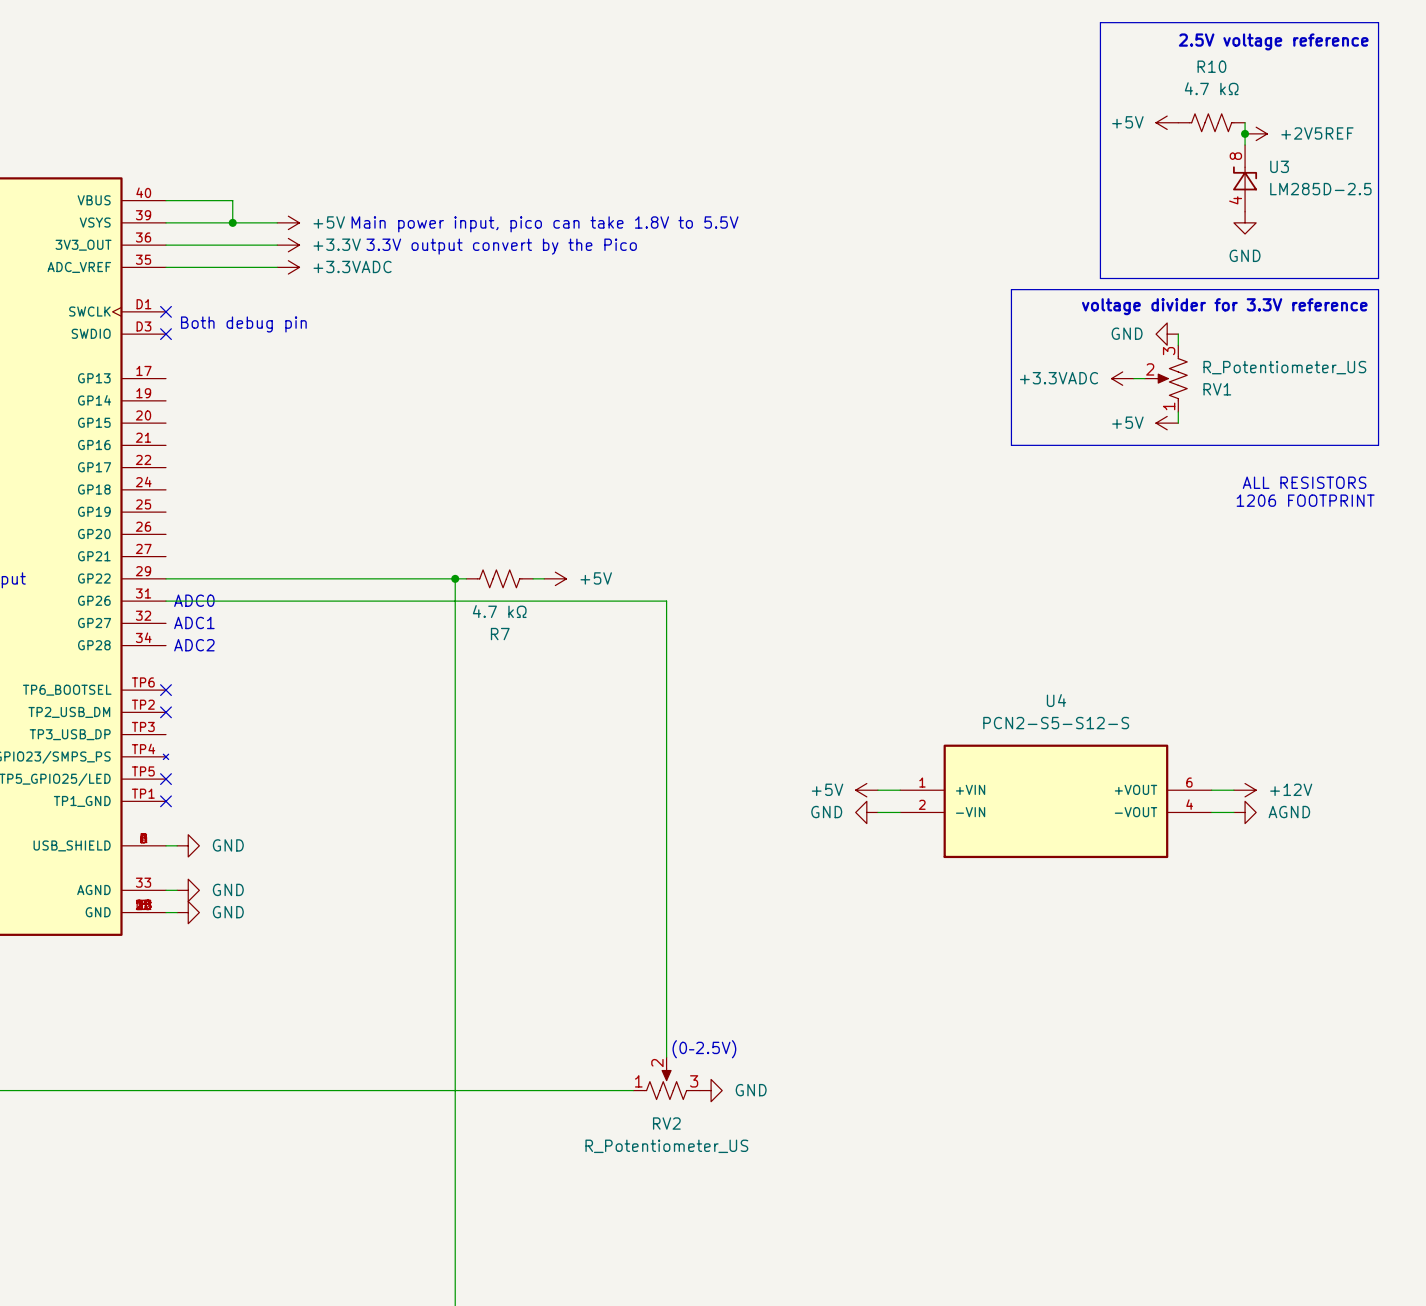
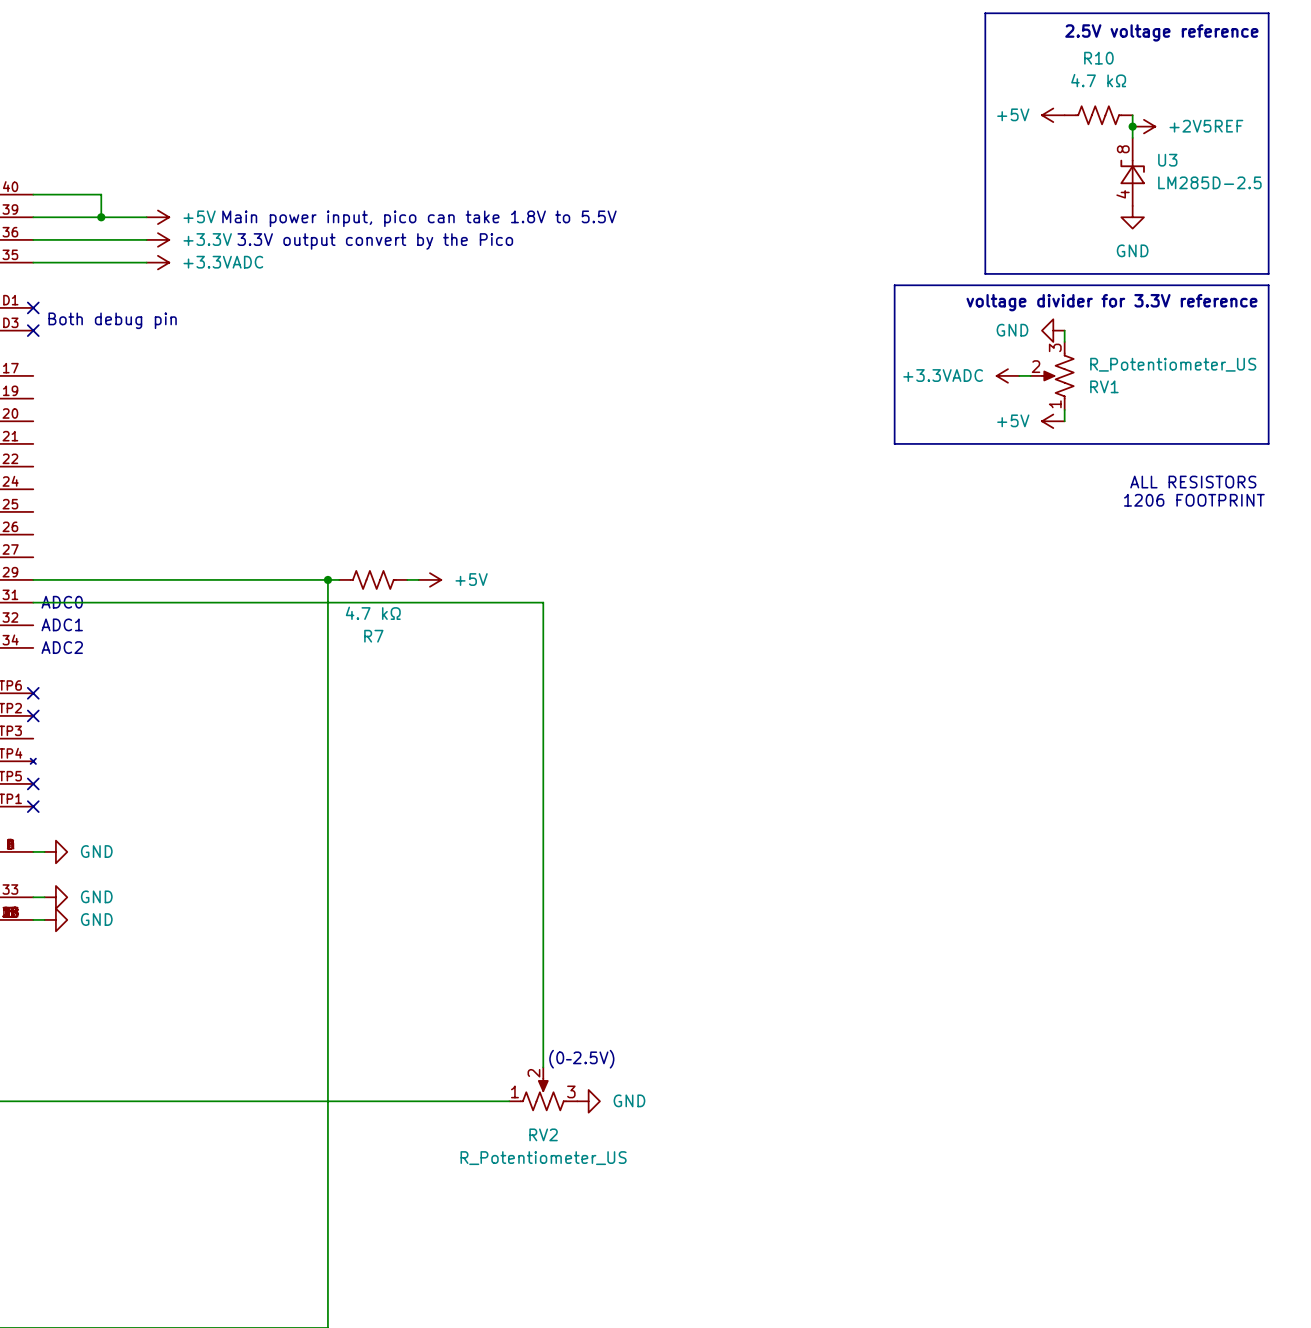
power symbol: +5V (866, 790) -> none
wire: (877, 790) (900, 790) -> none
wire: (1211, 790) (1233, 790) -> none
power symbol: +12V (1245, 790) -> none
U4: PCN2-S5-S12-S (1055, 801) -> none
power symbol: GND (866, 812) -> none
wire: (877, 812) (900, 812) -> none
wire: (1211, 812) (1233, 812) -> none
power symbol: AGND (1245, 812) -> none

